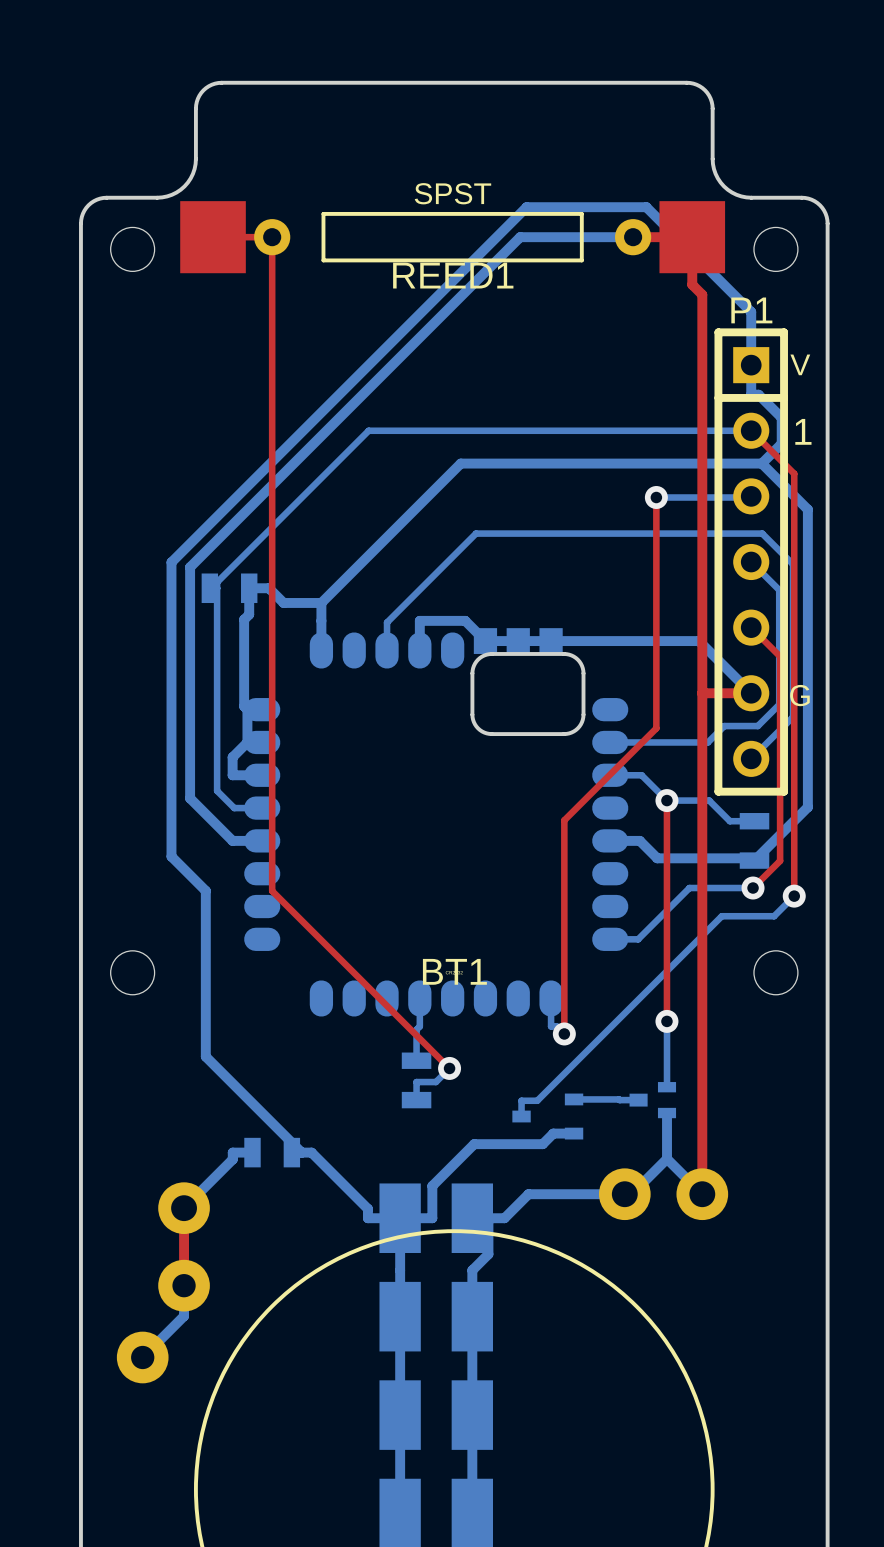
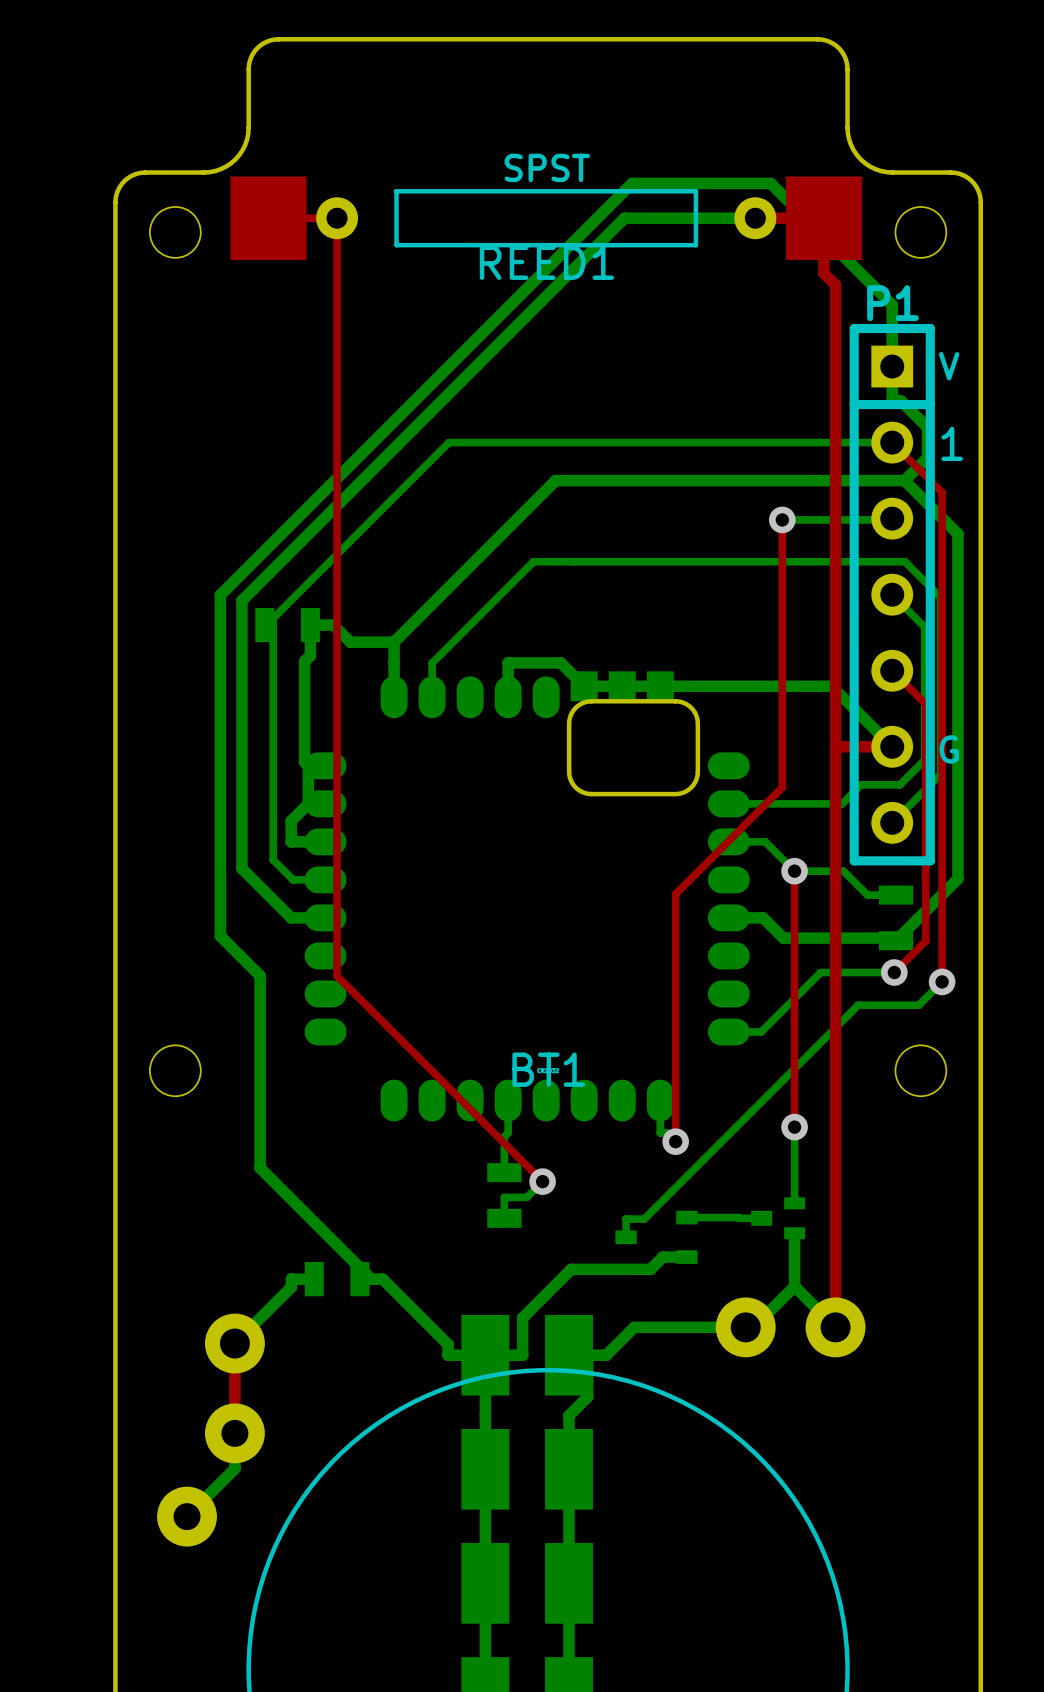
bottom track: (475, 533) (387, 622) (387, 650) -> (573, 561) (533, 561) (432, 663) (432, 697)

